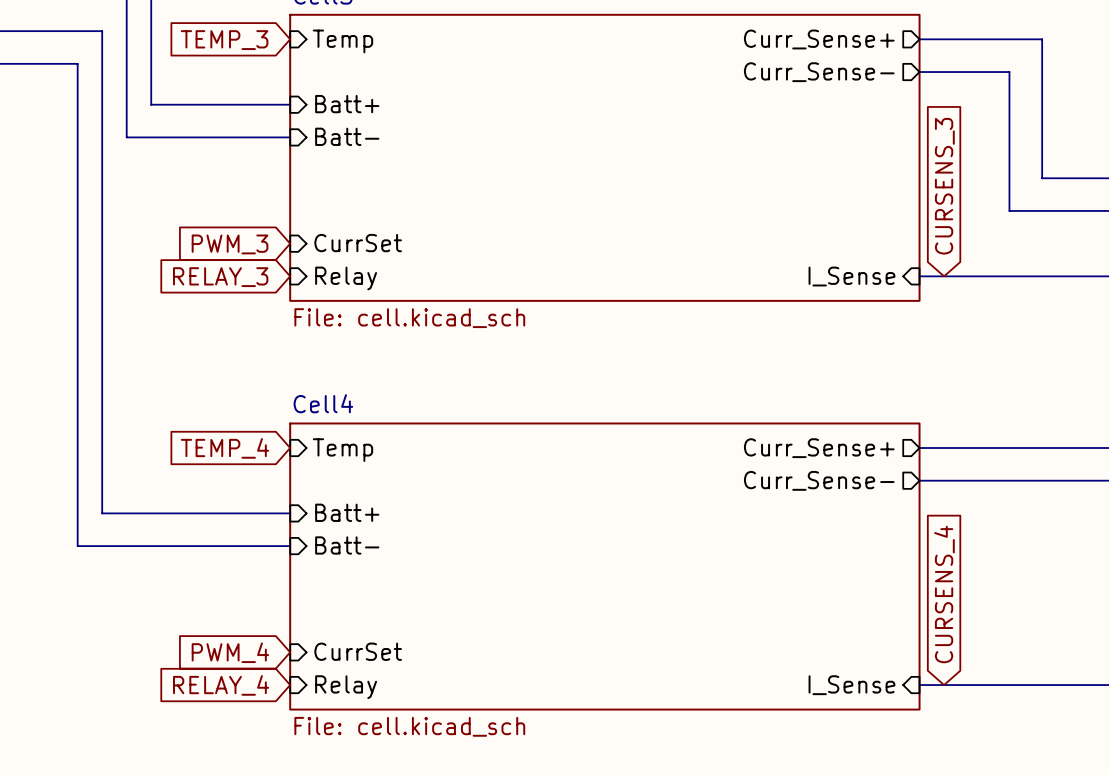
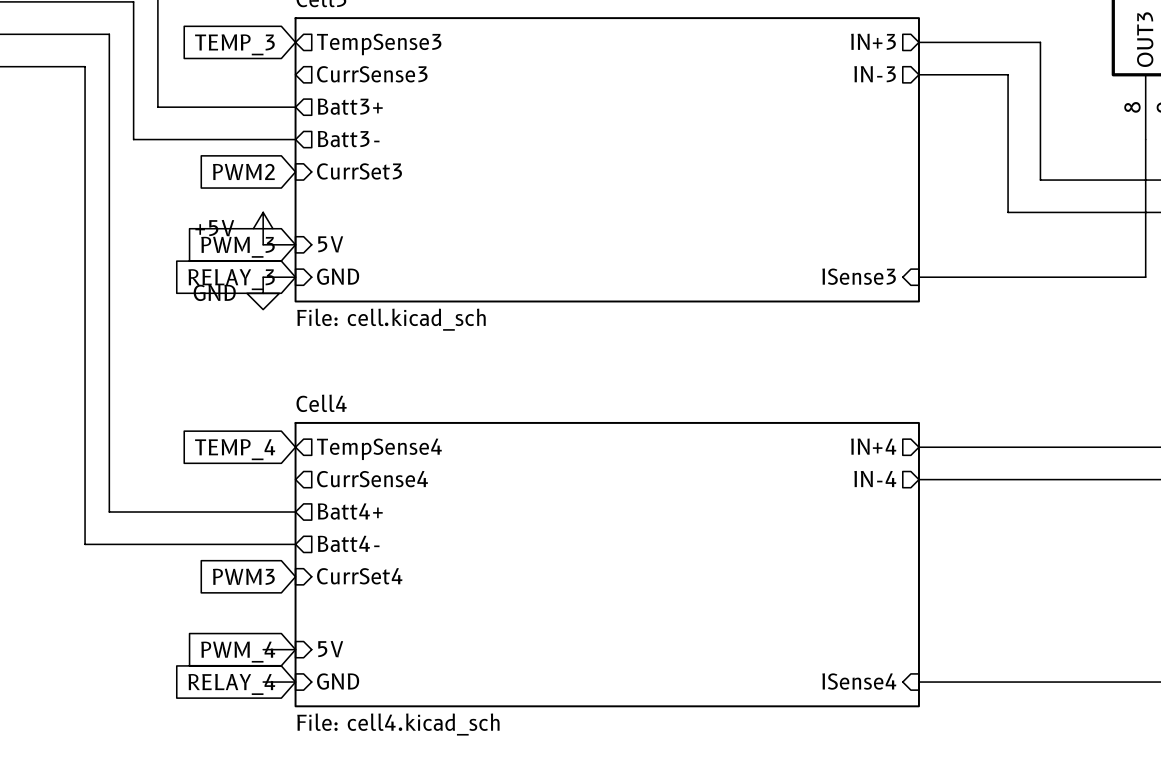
hierarchical label: none -> IN+3 (873, 41)
sheet pin: Curr_Sense+ (819, 39) -> none
sheet pin: Temp (342, 41) -> none
hierarchical label: none -> TempSense3 (379, 44)
hierarchical label: none -> CurrSense3 (372, 74)
hierarchical label: none -> IN-3 (875, 74)
sheet pin: Curr_Sense- (819, 72) -> none
sheet pin: Batt+ (347, 104) -> none
hierarchical label: none -> Batt3+ (350, 106)
sheet pin: Batt- (347, 136) -> none
hierarchical label: none -> Batt3- (348, 139)
hierarchical label: none -> CurrSet3 (359, 171)
global label: none -> PWM2 (243, 171)
global label: CURSENS_3 (944, 186) -> none
power symbol: none -> +5V (263, 228)
wire: none -> (263, 244) (295, 244)
hierarchical label: none -> 5V (330, 244)
sheet pin: CurrSet (358, 243) -> none
hierarchical label: none -> GND (338, 276)
hierarchical label: none -> ISense3 (859, 276)
wire: none -> (263, 277) (295, 277)
sheet pin: I_Sense (851, 276) -> none
sheet pin: Relay (346, 278) -> none
power symbol: none -> GND (263, 293)
hierarchical label: none -> IN+4 (873, 446)
sheet pin: Curr_Sense+ (819, 448) -> none
hierarchical label: none -> TempSense4 (379, 449)
sheet pin: Temp (342, 450) -> none
hierarchical label: none -> CurrSense4 (372, 479)
hierarchical label: none -> IN-4 (875, 479)
sheet pin: Curr_Sense- (819, 480) -> none
sheet pin: Batt+ (347, 512) -> none
hierarchical label: none -> Batt4+ (350, 511)
sheet pin: Batt- (347, 545) -> none
hierarchical label: none -> Batt4- (348, 543)
hierarchical label: none -> CurrSet4 (359, 576)
global label: none -> PWM3 (243, 576)
global label: CURSENS_4 (944, 594) -> none
hierarchical label: none -> 5V (330, 649)
sheet pin: CurrSet (358, 651) -> none
wire: none -> (263, 649) (295, 649)
hierarchical label: none -> GND (338, 681)
hierarchical label: none -> ISense4 (859, 681)
wire: none -> (263, 682) (295, 682)
sheet pin: I_Sense (851, 685) -> none
sheet pin: Relay (346, 687) -> none
sheet Cell4 value: File: cell.kicad_sch (409, 726) -> File: cell4.kicad_sch (398, 724)

